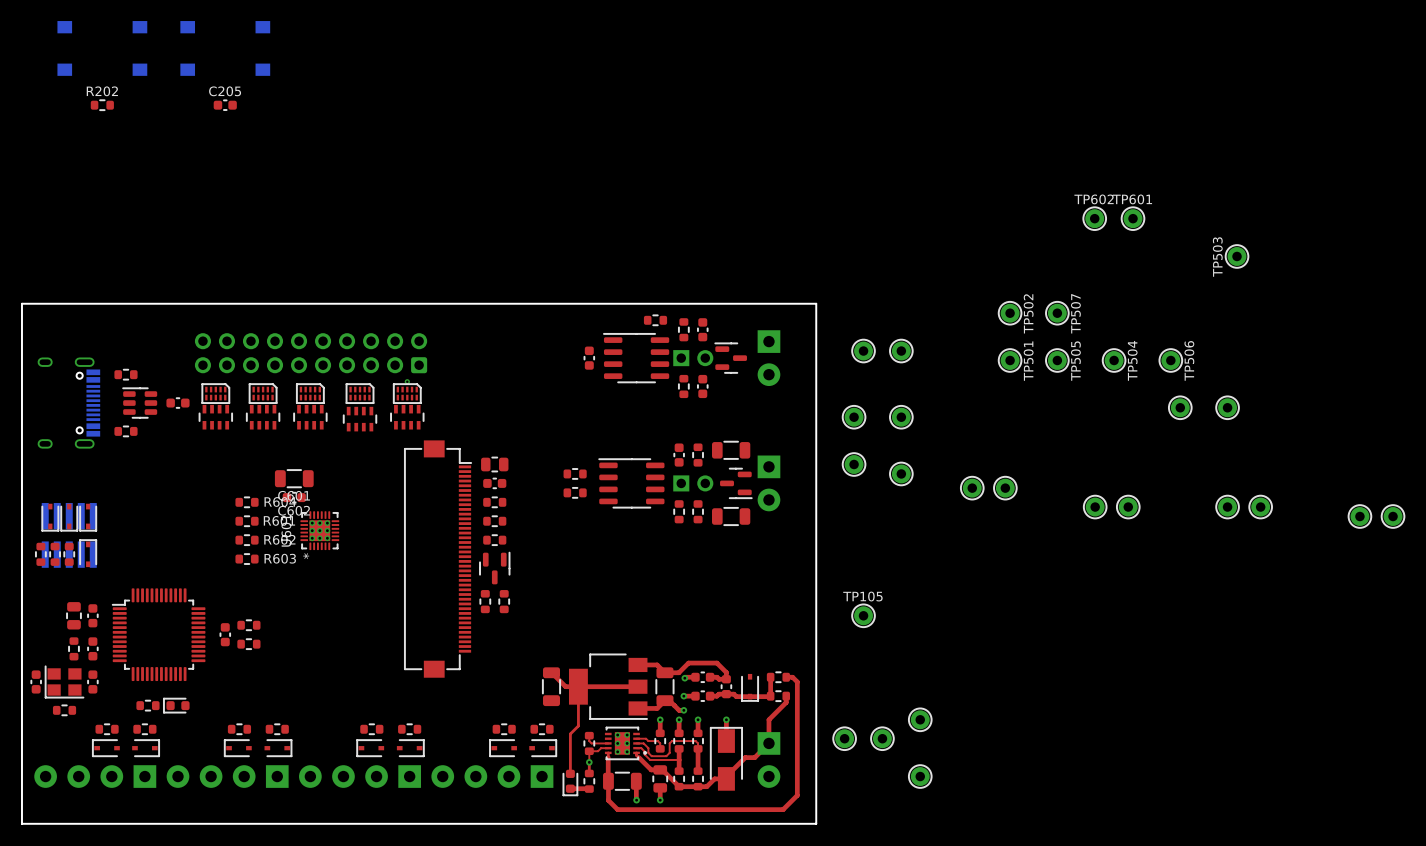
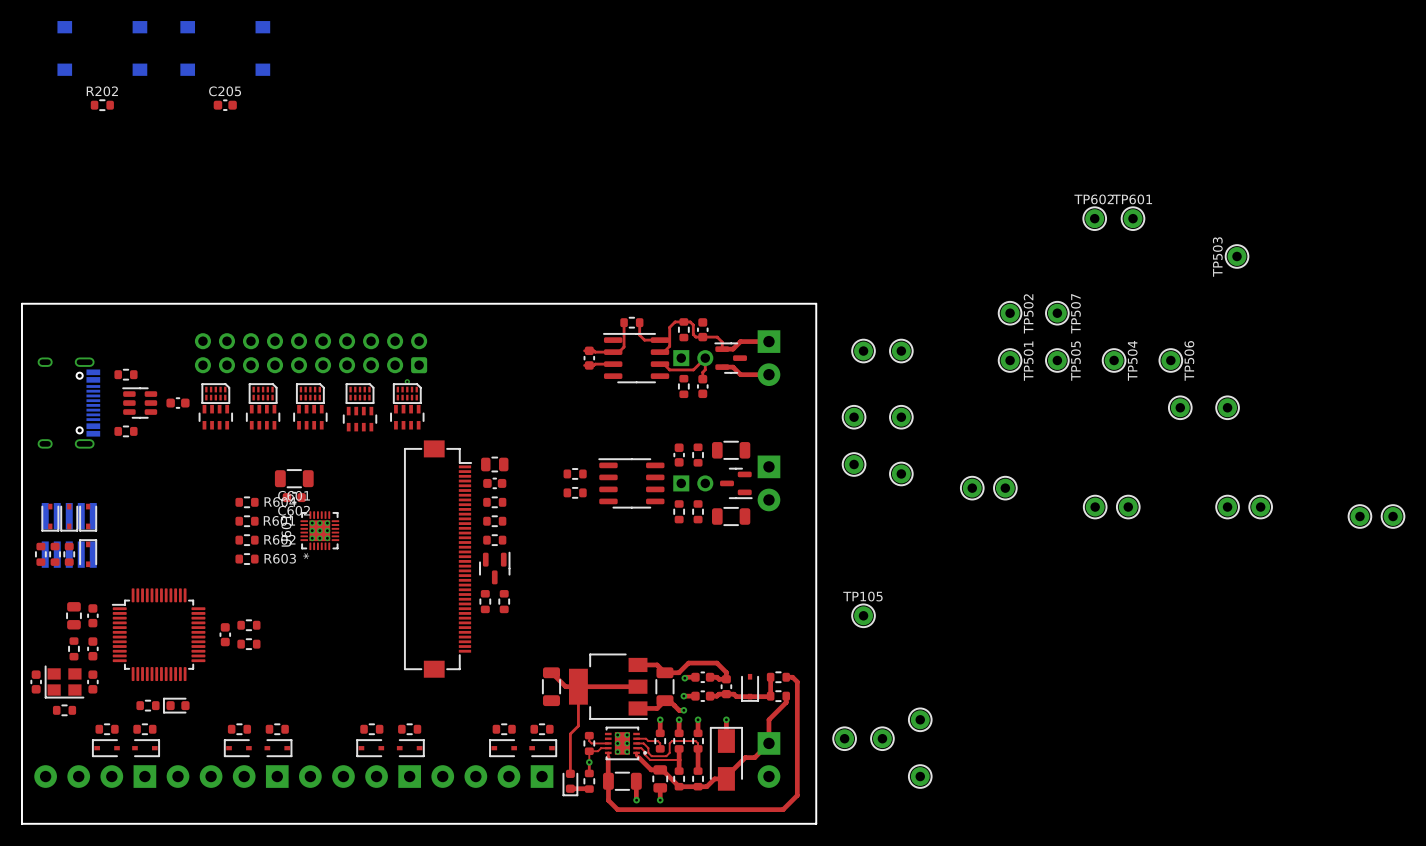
part position: (655, 320) -> (631, 322)
top track: none -> (624, 322) (624, 347) (618, 352) (584, 350)
top track: none -> (639, 322) (639, 335) (644, 340) (655, 340)
top track: none -> (768, 341) (740, 341) (733, 349) (719, 349)
top track: none -> (722, 349) (722, 342) (717, 337) (695, 337) (693, 334) (693, 325) (690, 321) (675, 321) (669, 327) (669, 346) (663, 352) (655, 352)
top track: none -> (608, 364) (584, 365)
top track: none -> (655, 364) (663, 364) (669, 369) (693, 369) (705, 358) (702, 379)
top track: none -> (721, 367) (733, 367) (740, 374) (768, 374)

